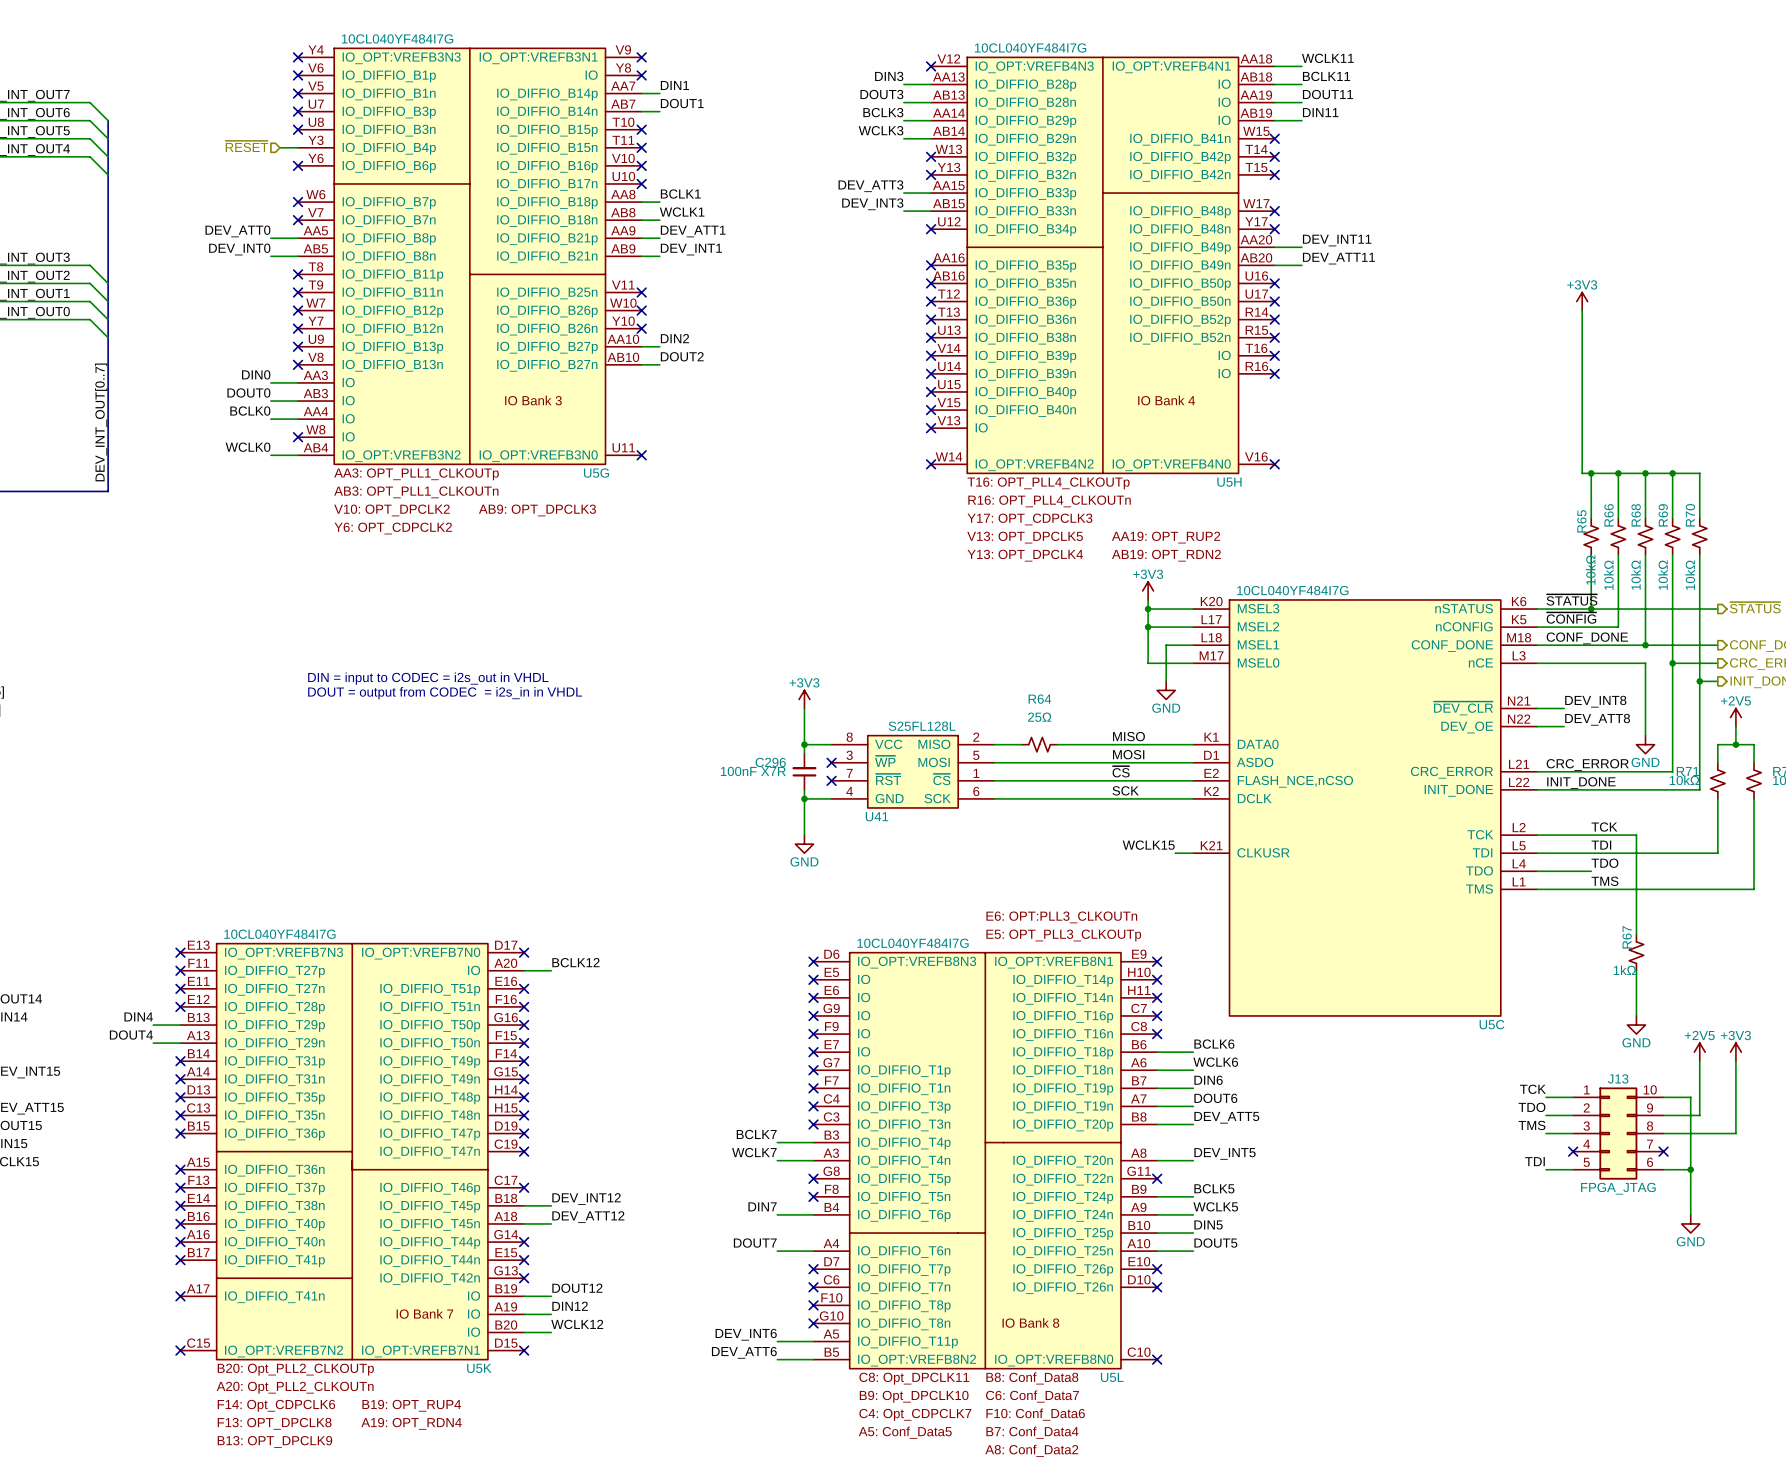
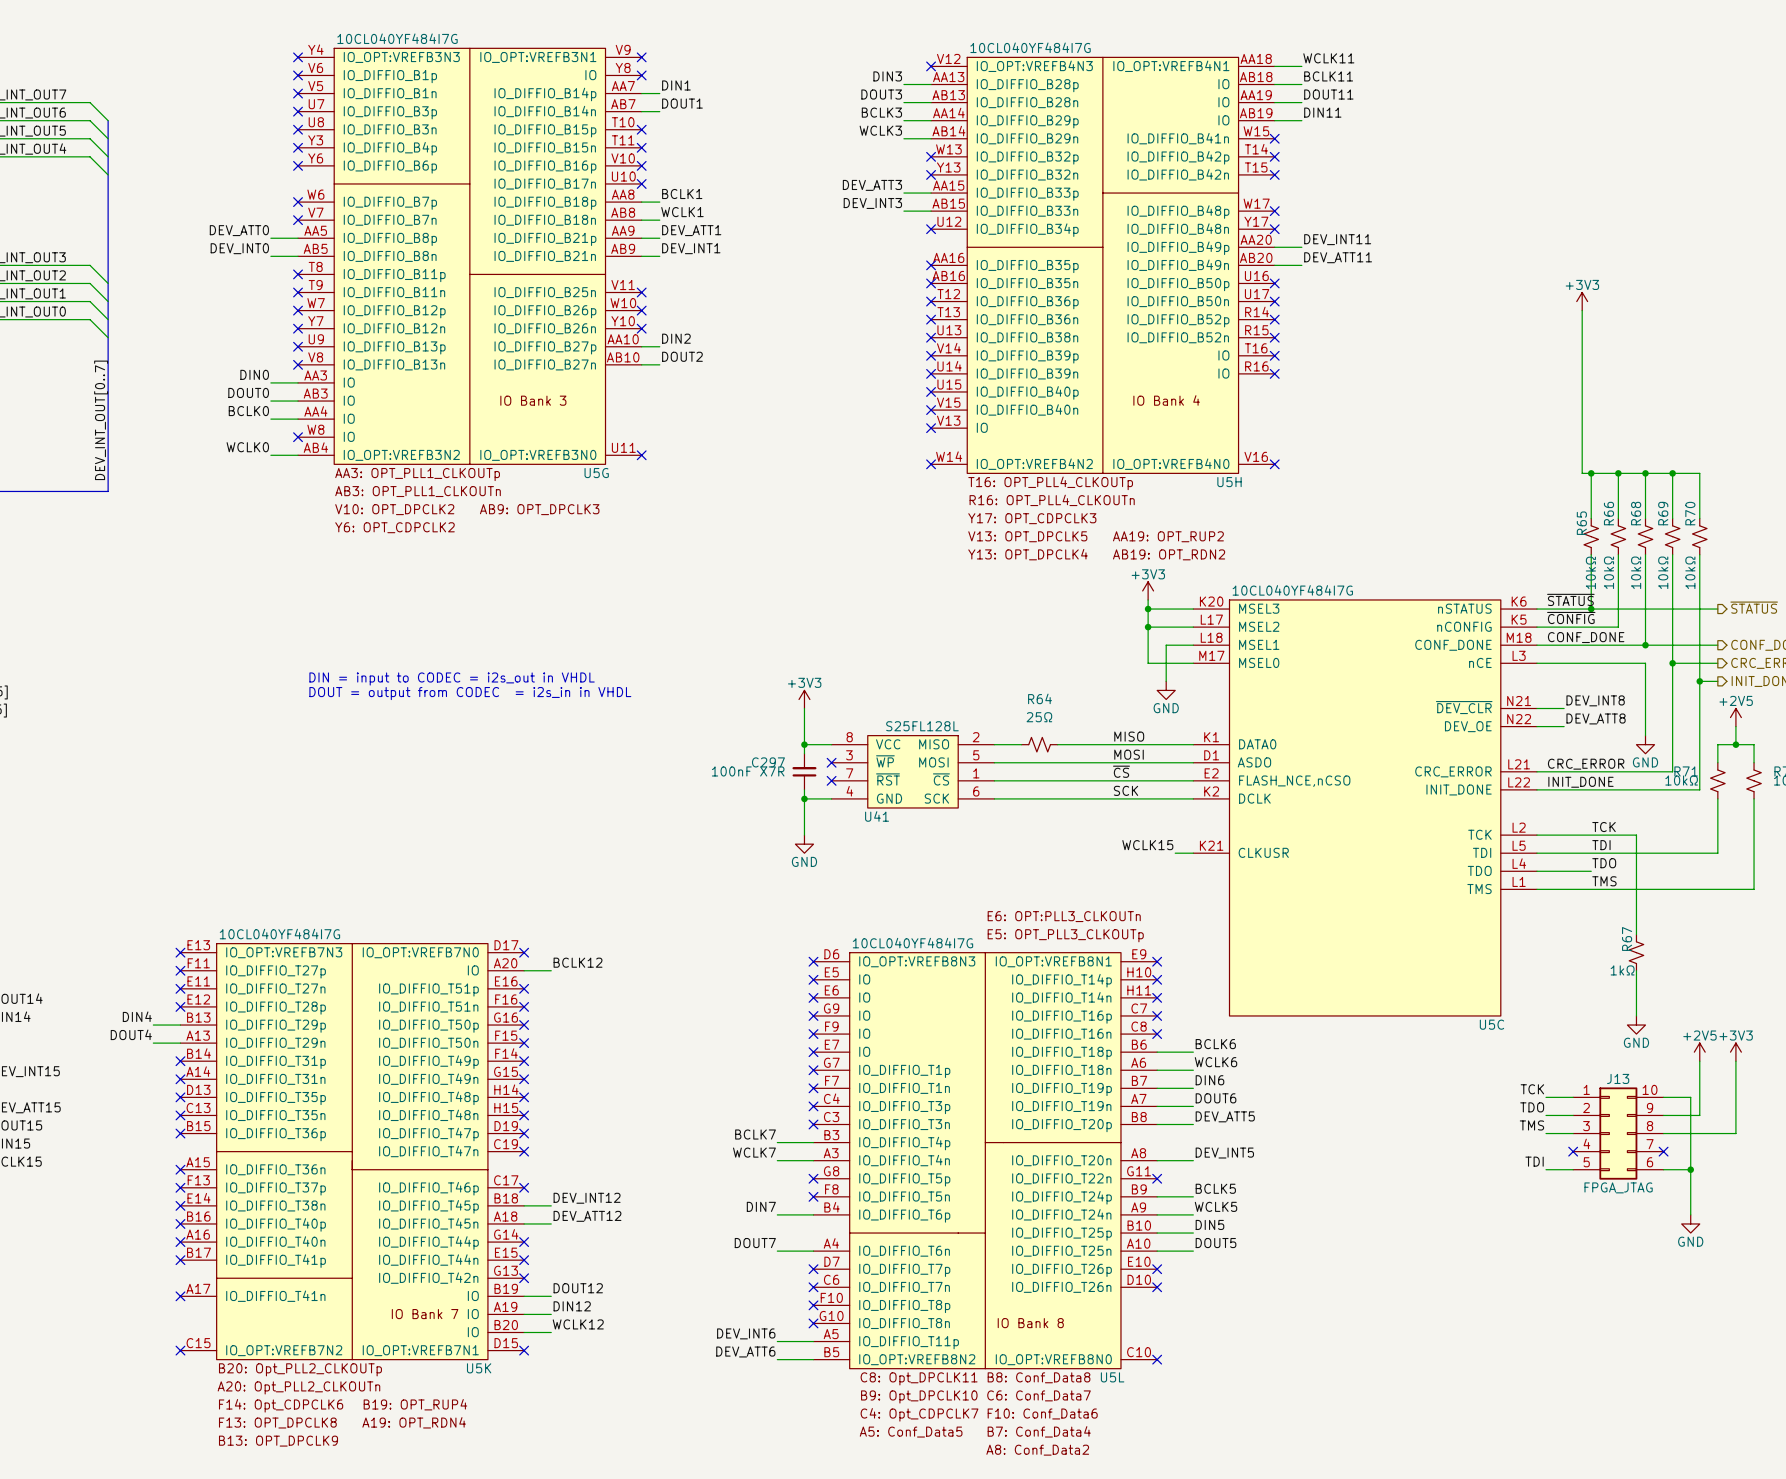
hierarchical label: ~{RESET} (246, 146) -> none
wire: (279, 147) (298, 147) -> none
no-connect mark: none -> (298, 147)
C296 name: C296 (770, 762) -> C297 (768, 762)

